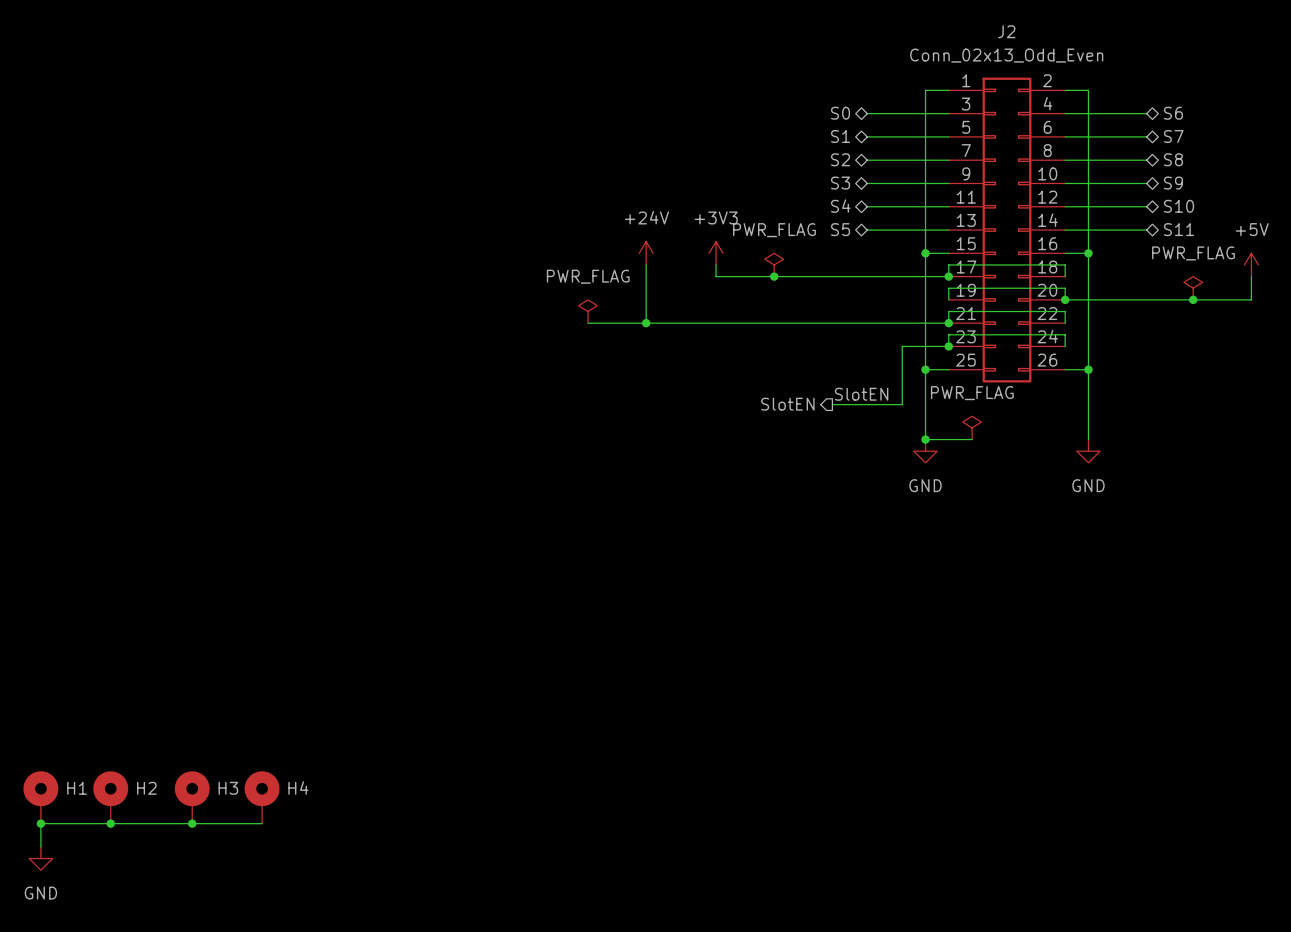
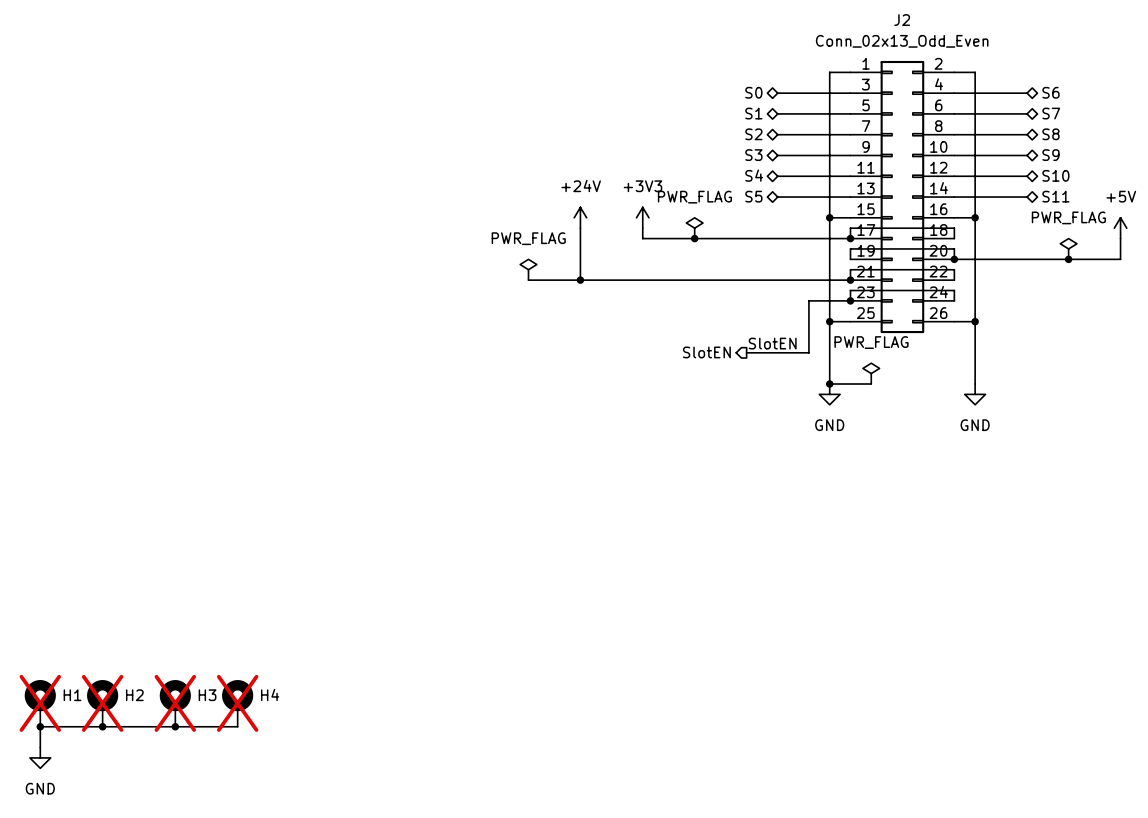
H1 do-not-place cross: none -> (40, 703)
H2 do-not-place cross: none -> (102, 703)
H3 do-not-place cross: none -> (175, 703)
H4 do-not-place cross: none -> (237, 703)

